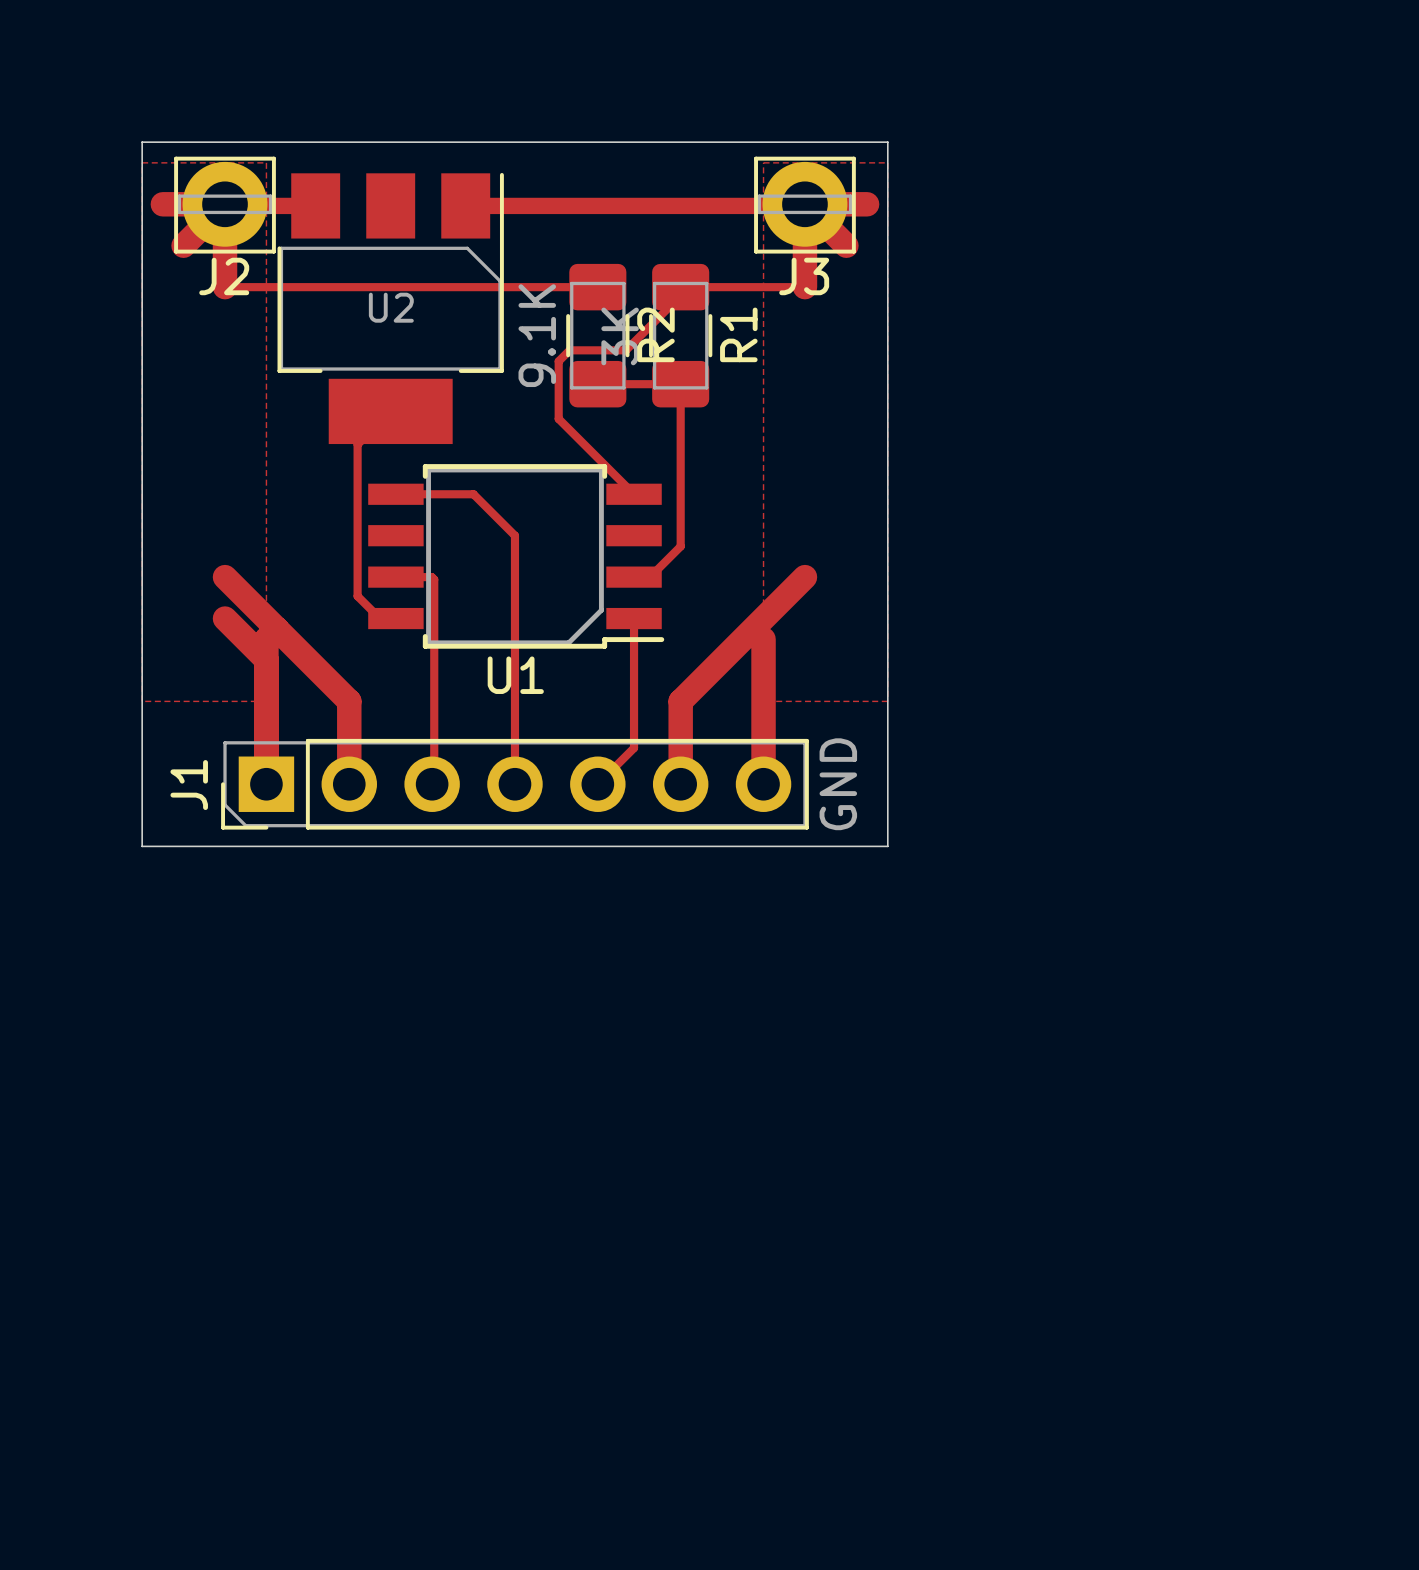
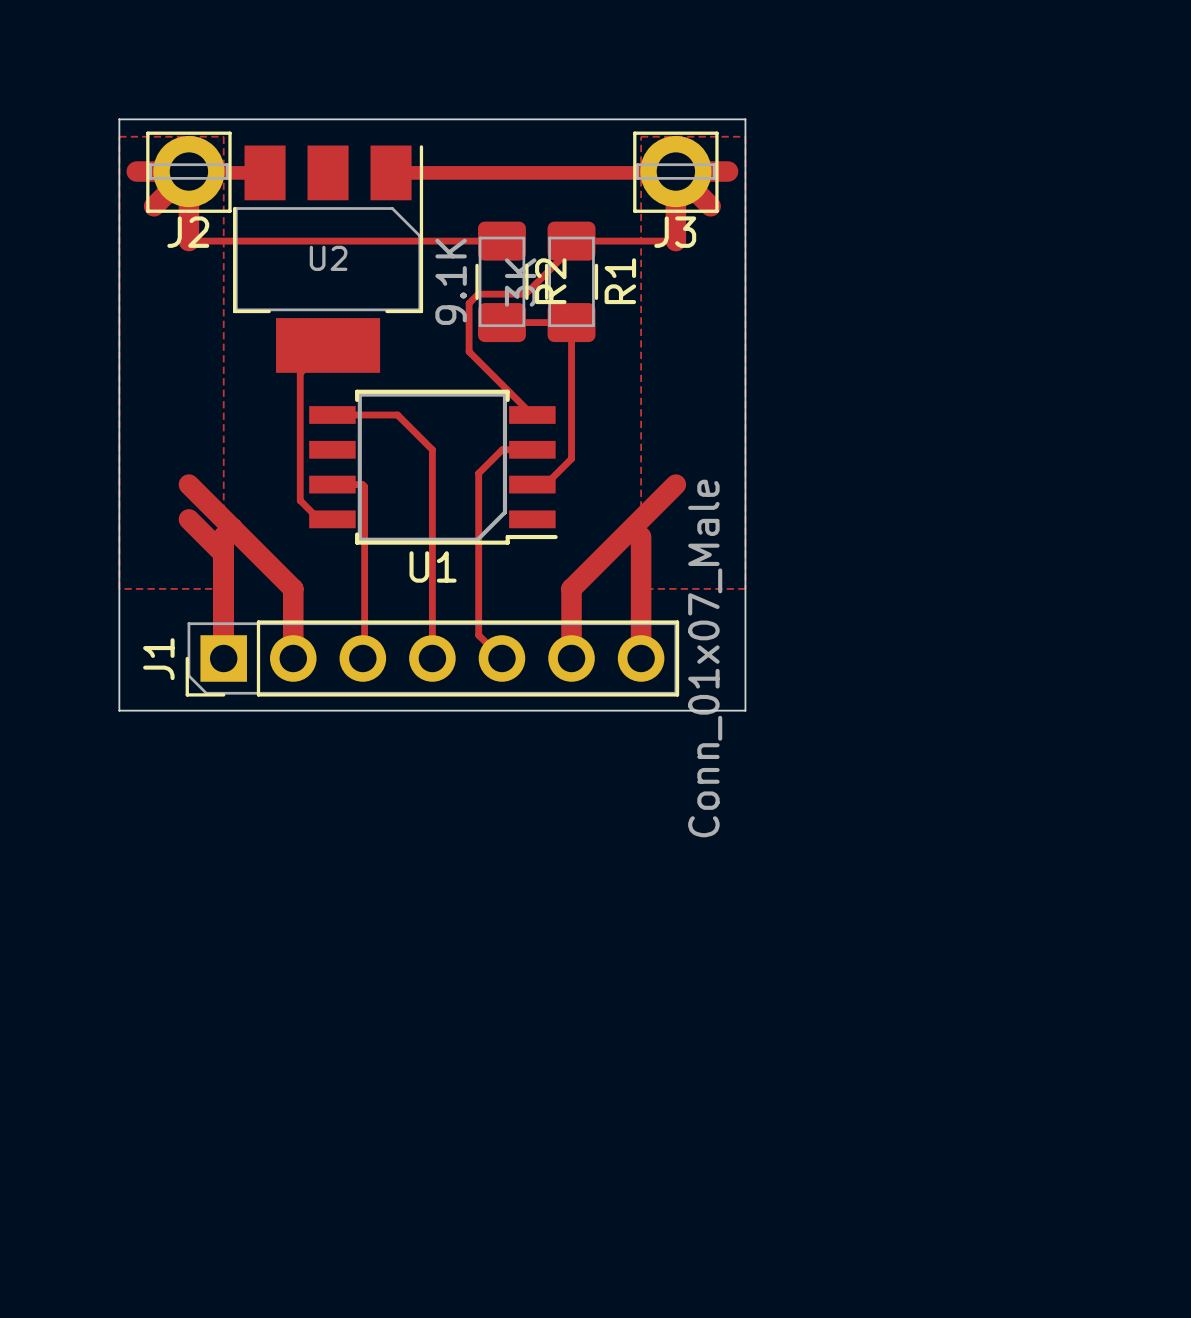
track: (634, 618) (634, 748) (597, 784) -> (532, 449) (502, 449) (478, 473) (478, 635) (501, 658)
J1 value: GND (838, 784) -> Conn_01x07_Male (705, 658)

